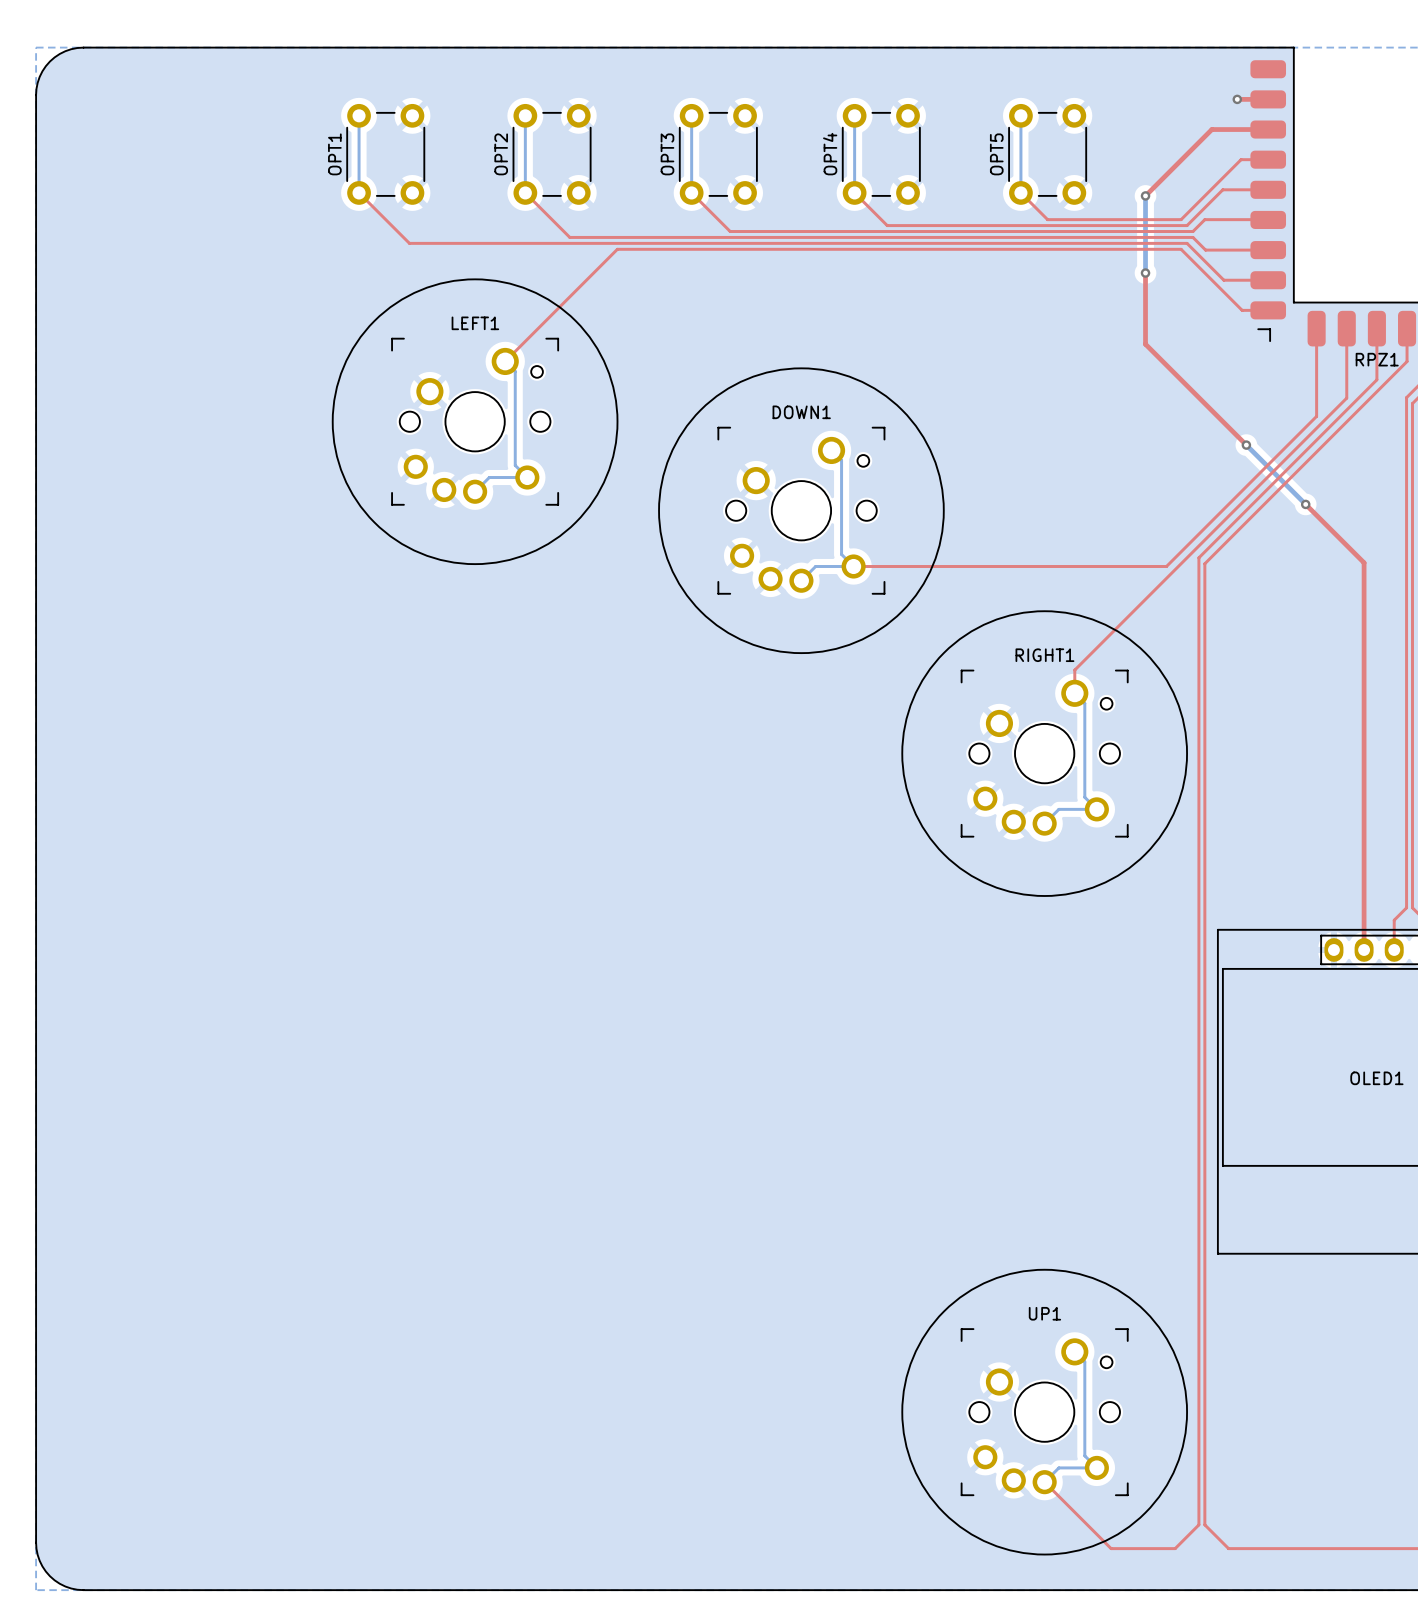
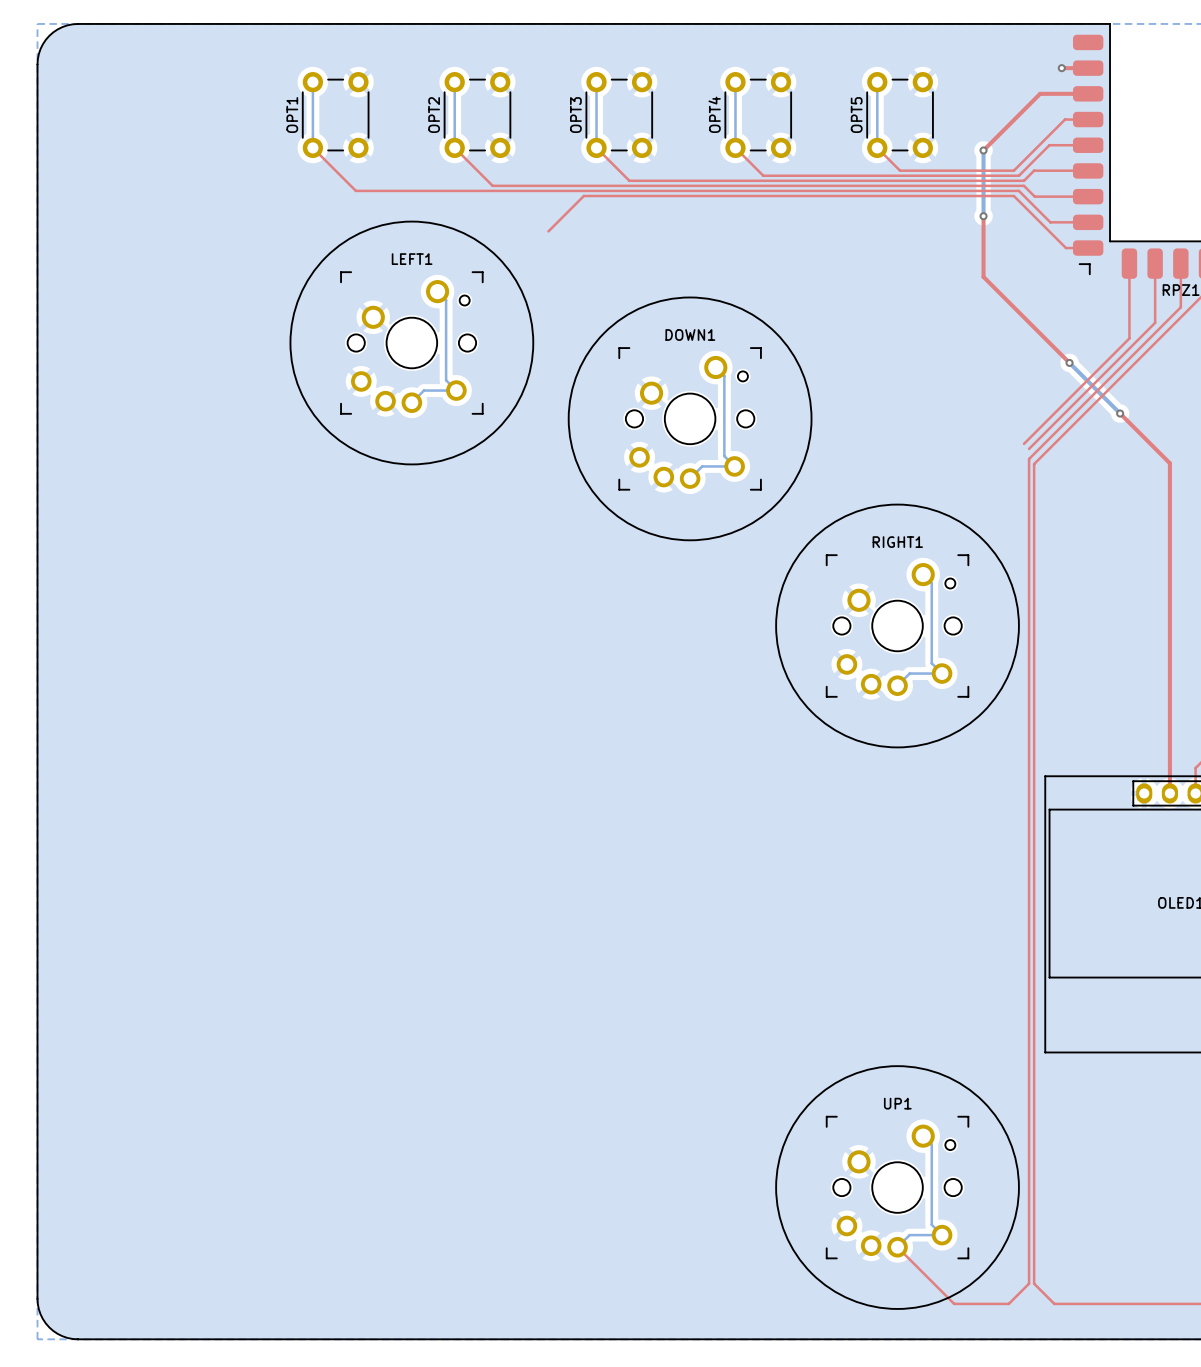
top track: (676, 249) (617, 249) (505, 361) -> (583, 195) (548, 231)
top track: (1192, 540) (1166, 566) (853, 566) -> none
top track: (1198, 545) (1074, 670) (1074, 693) -> none

